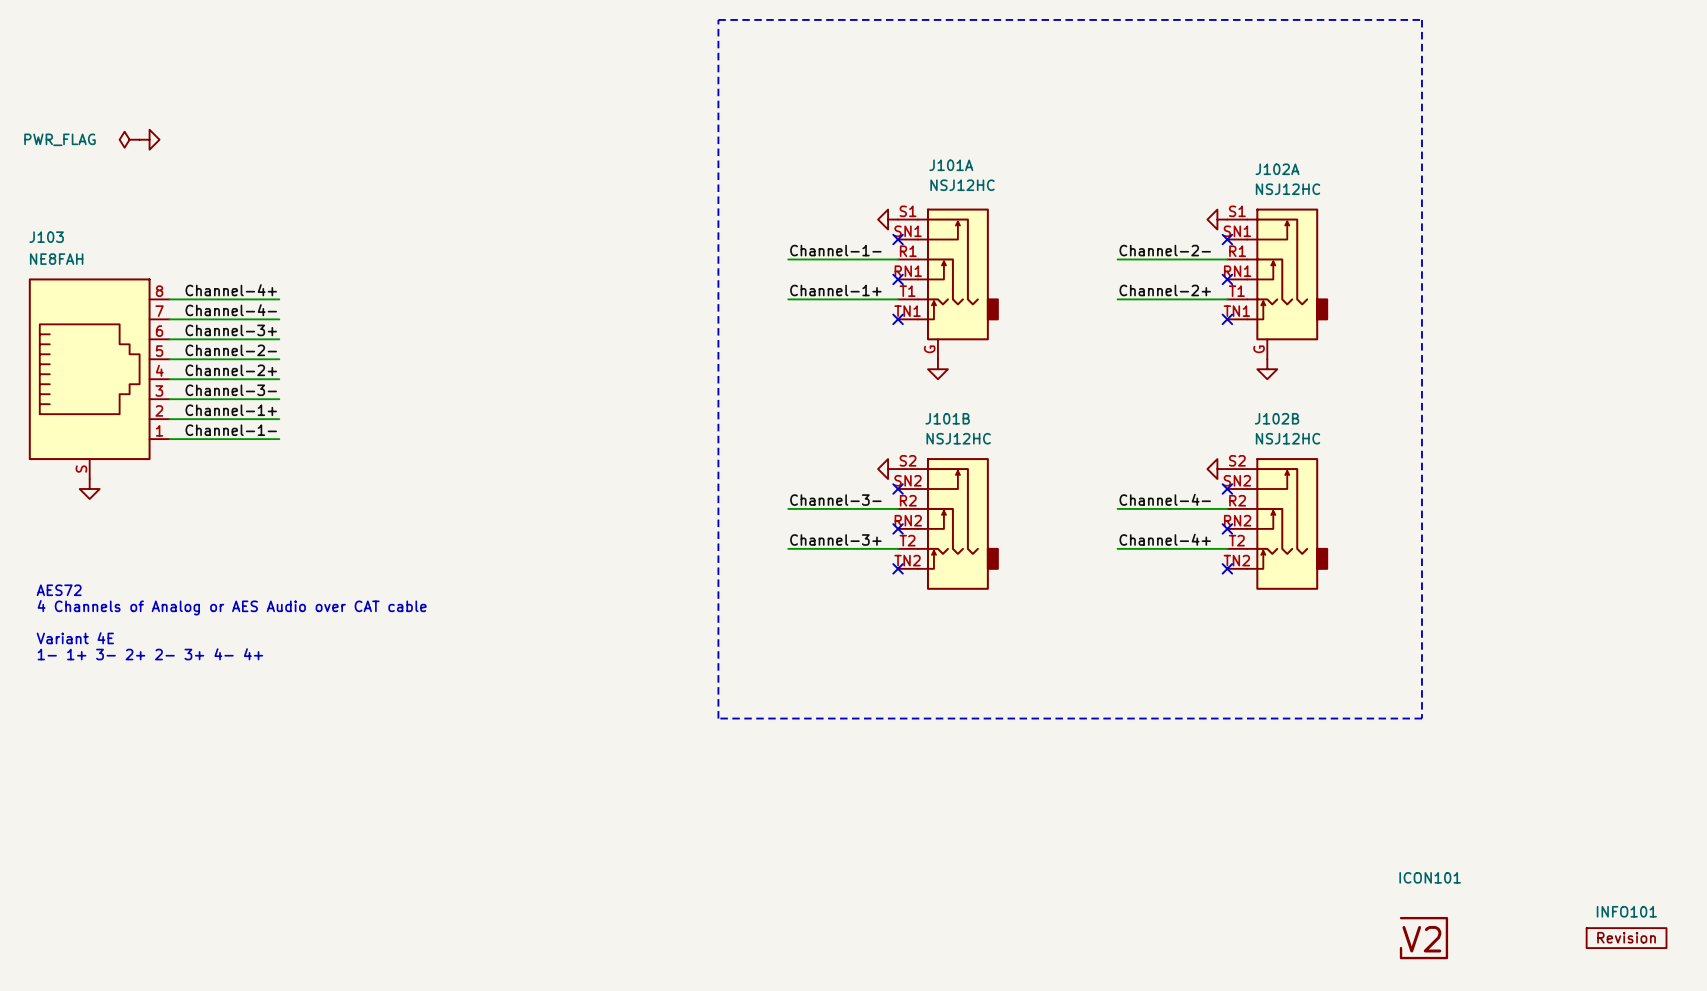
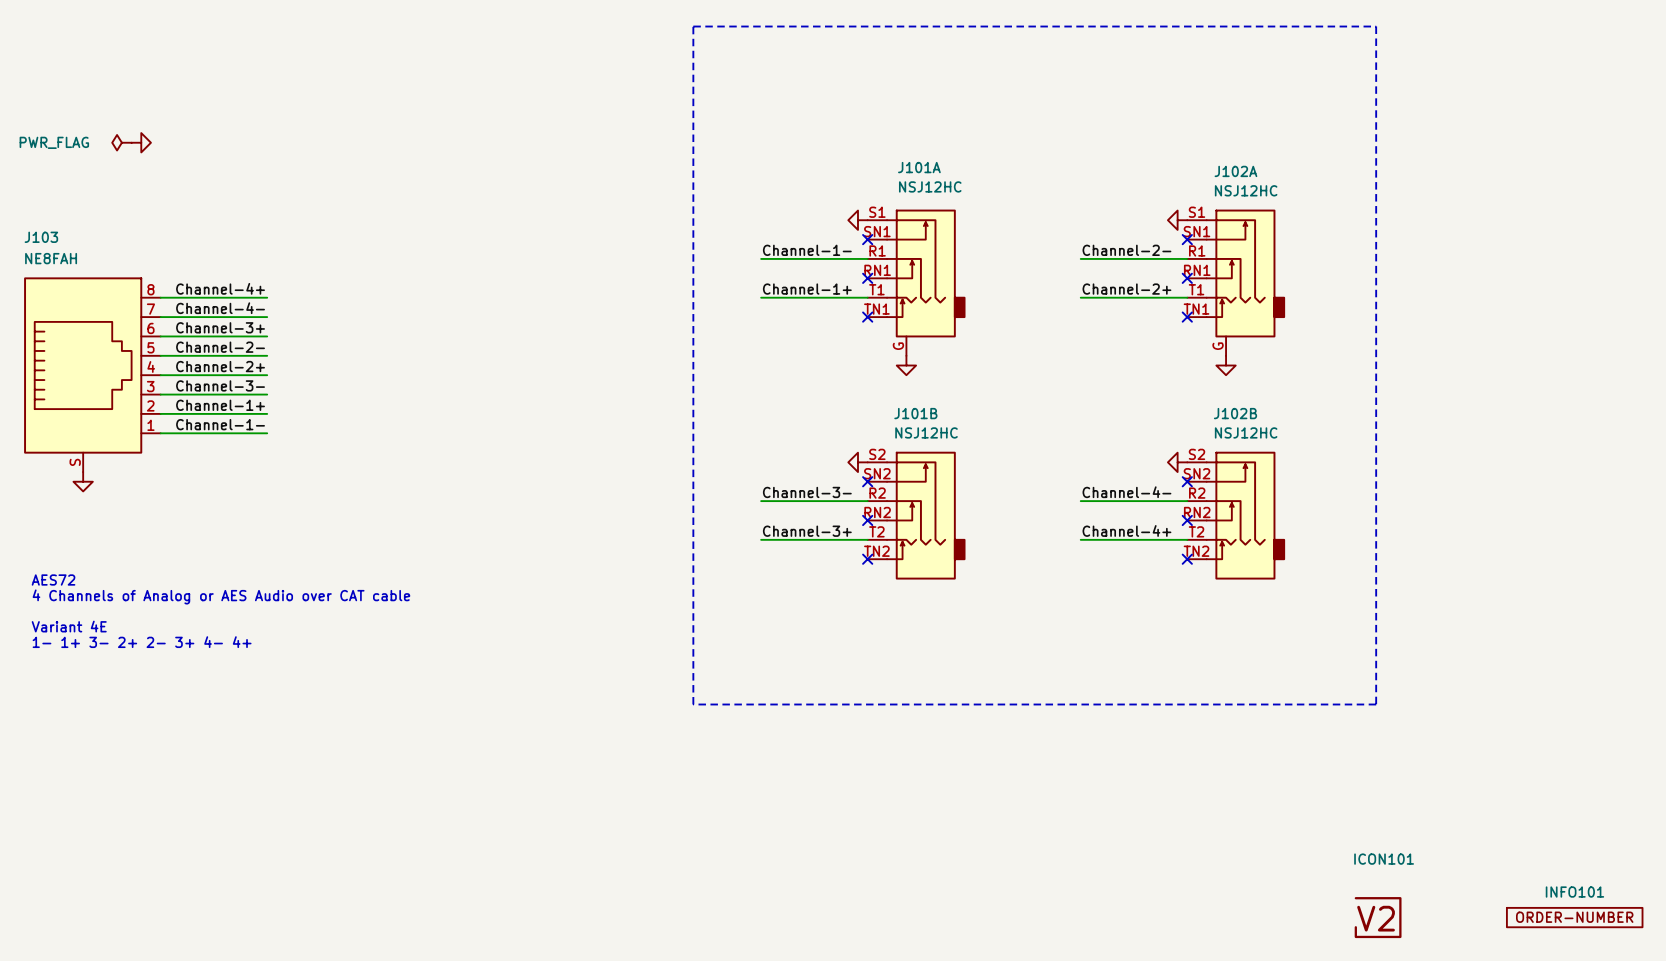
INFO101 symbol: [1586, 928, 1667, 949] -> [1506, 907, 1643, 928]

